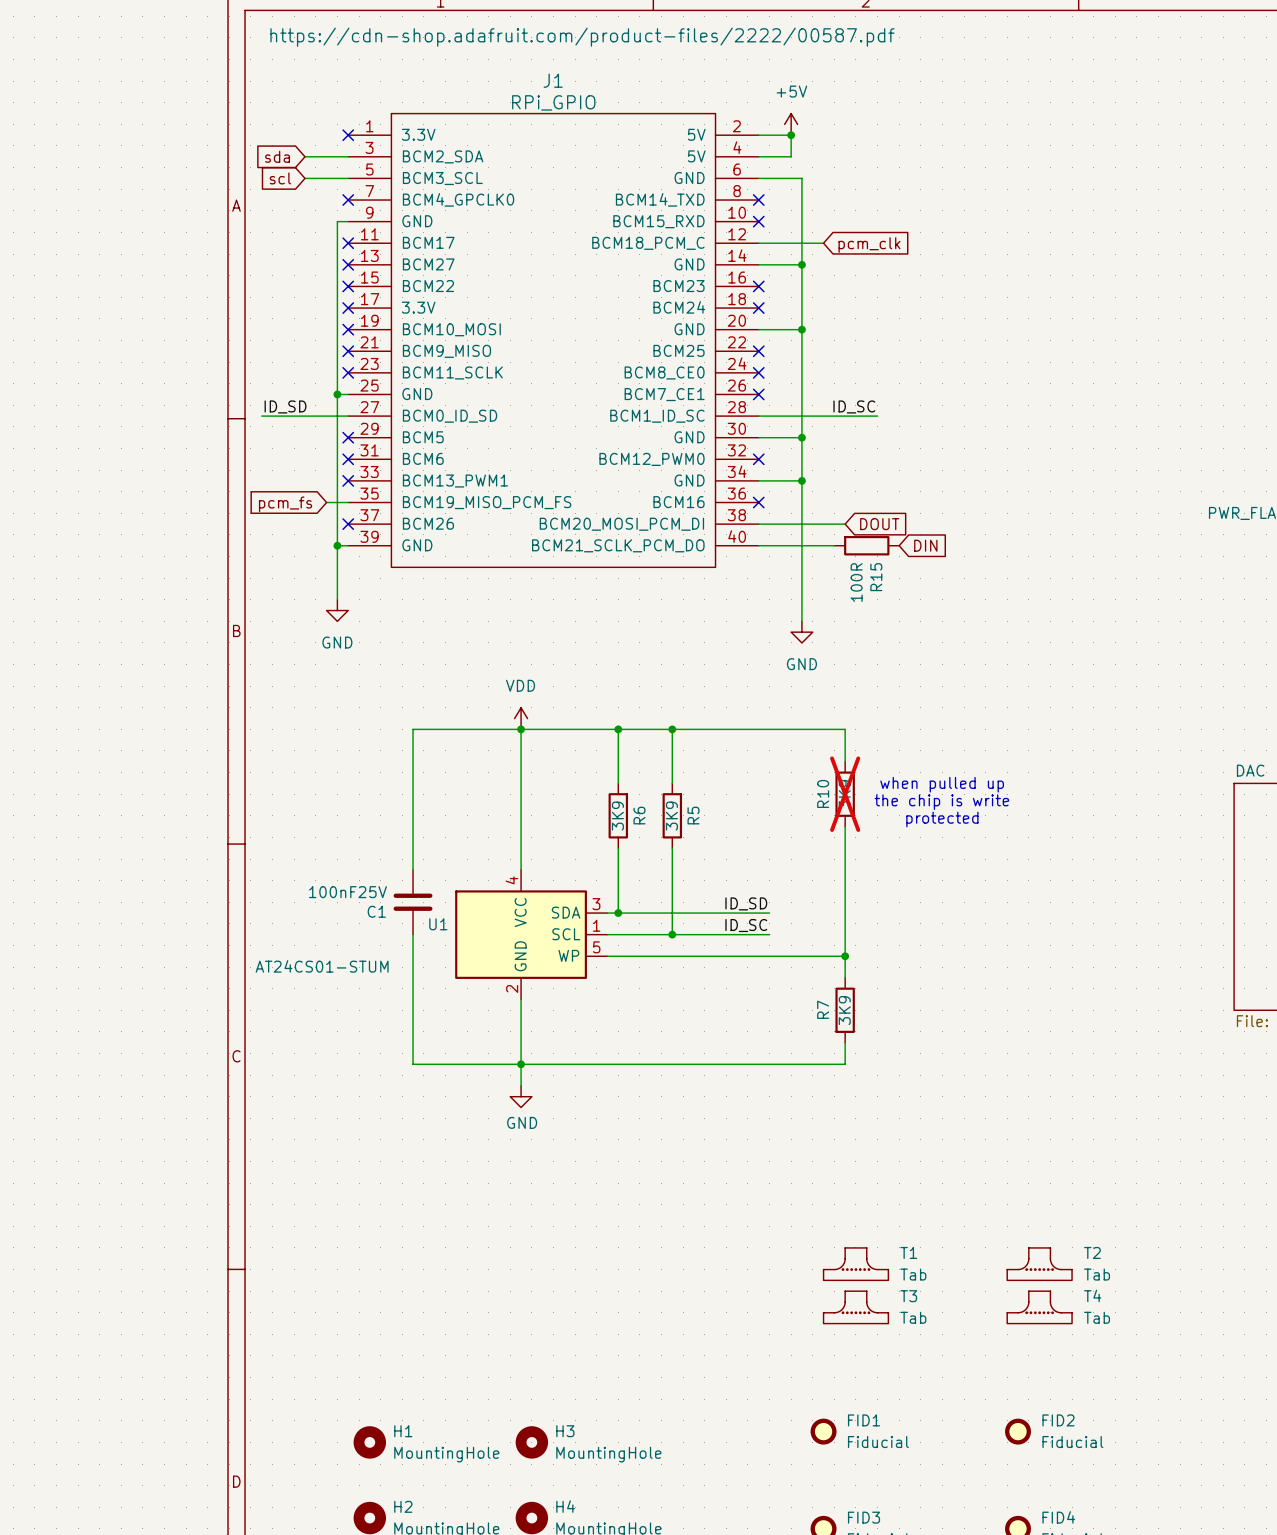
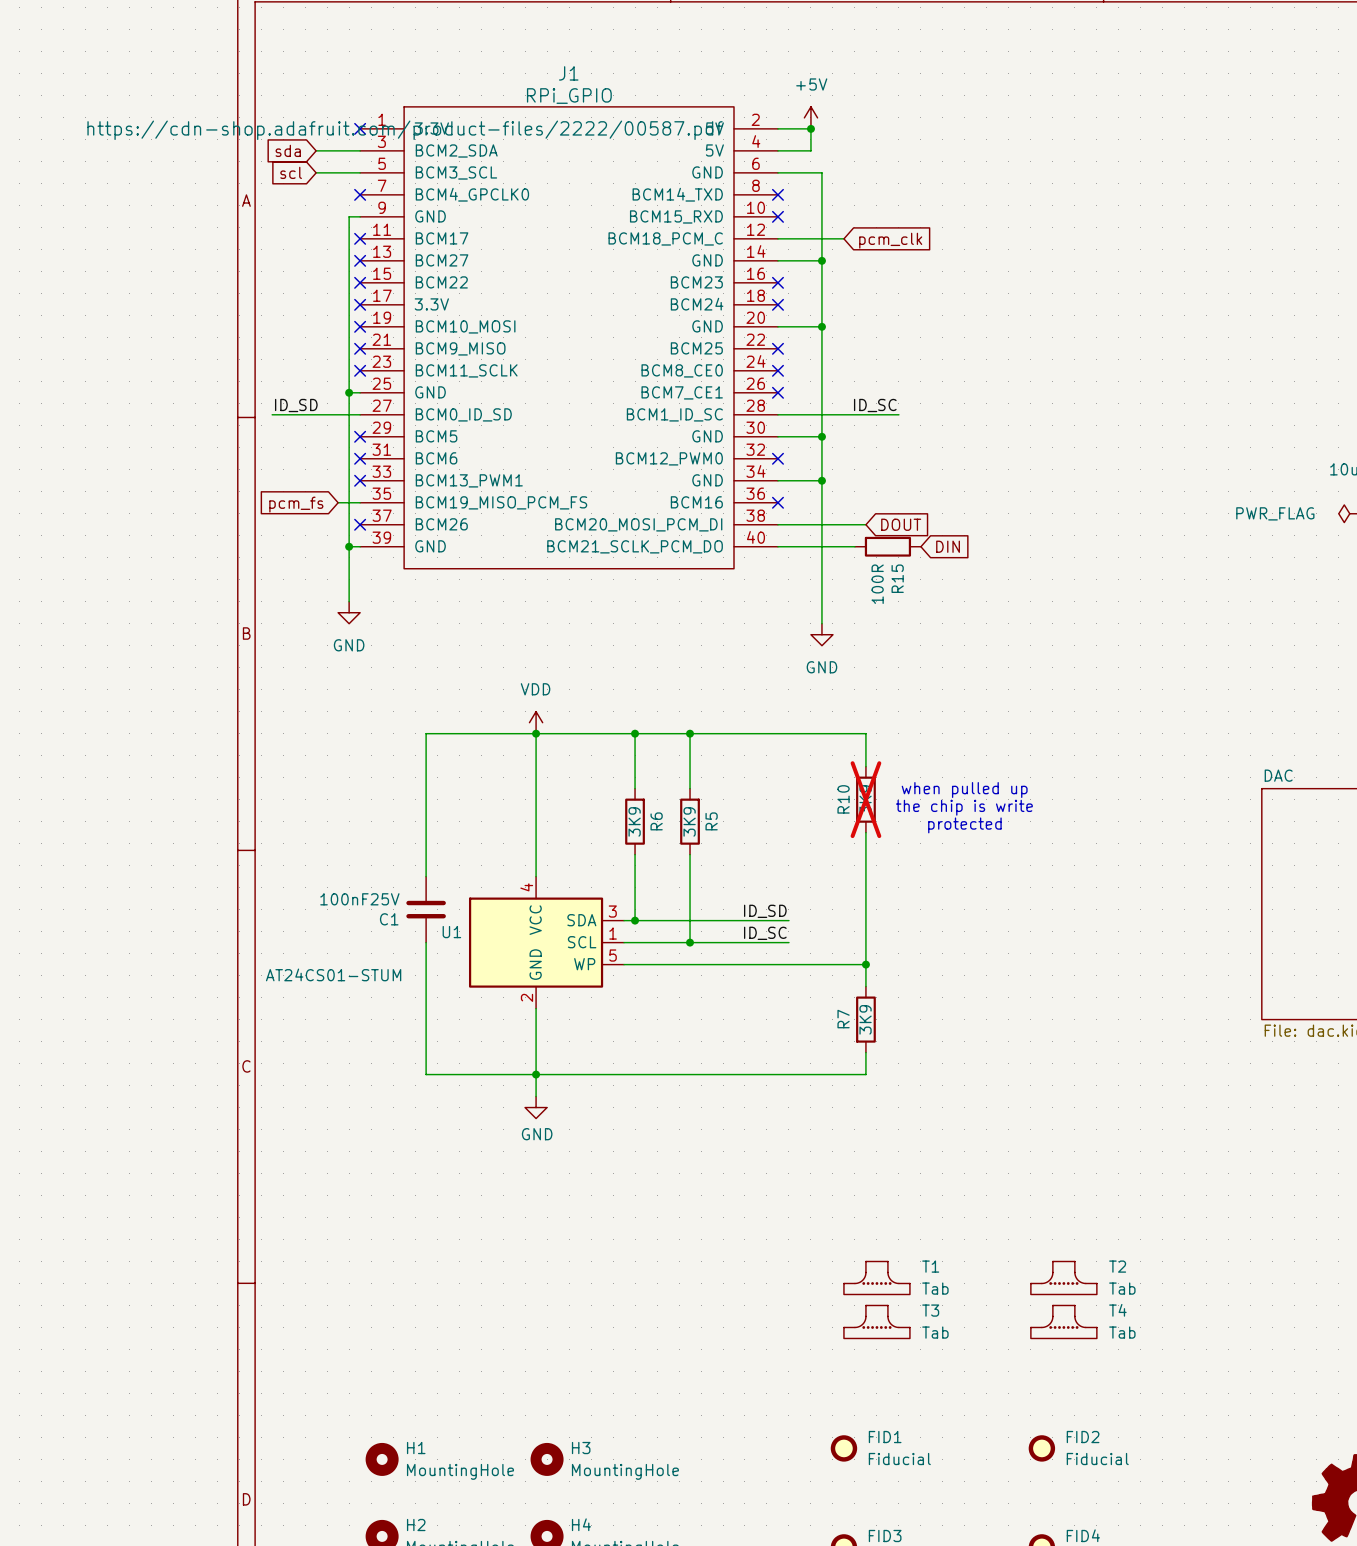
J1 text position: https://cdn-shop.adafruit.com/product-files/2222/00587.pdf (582, 37) -> https://cdn-shop.adafruit.com/product-files/2222/00587.pdf (405, 130)

